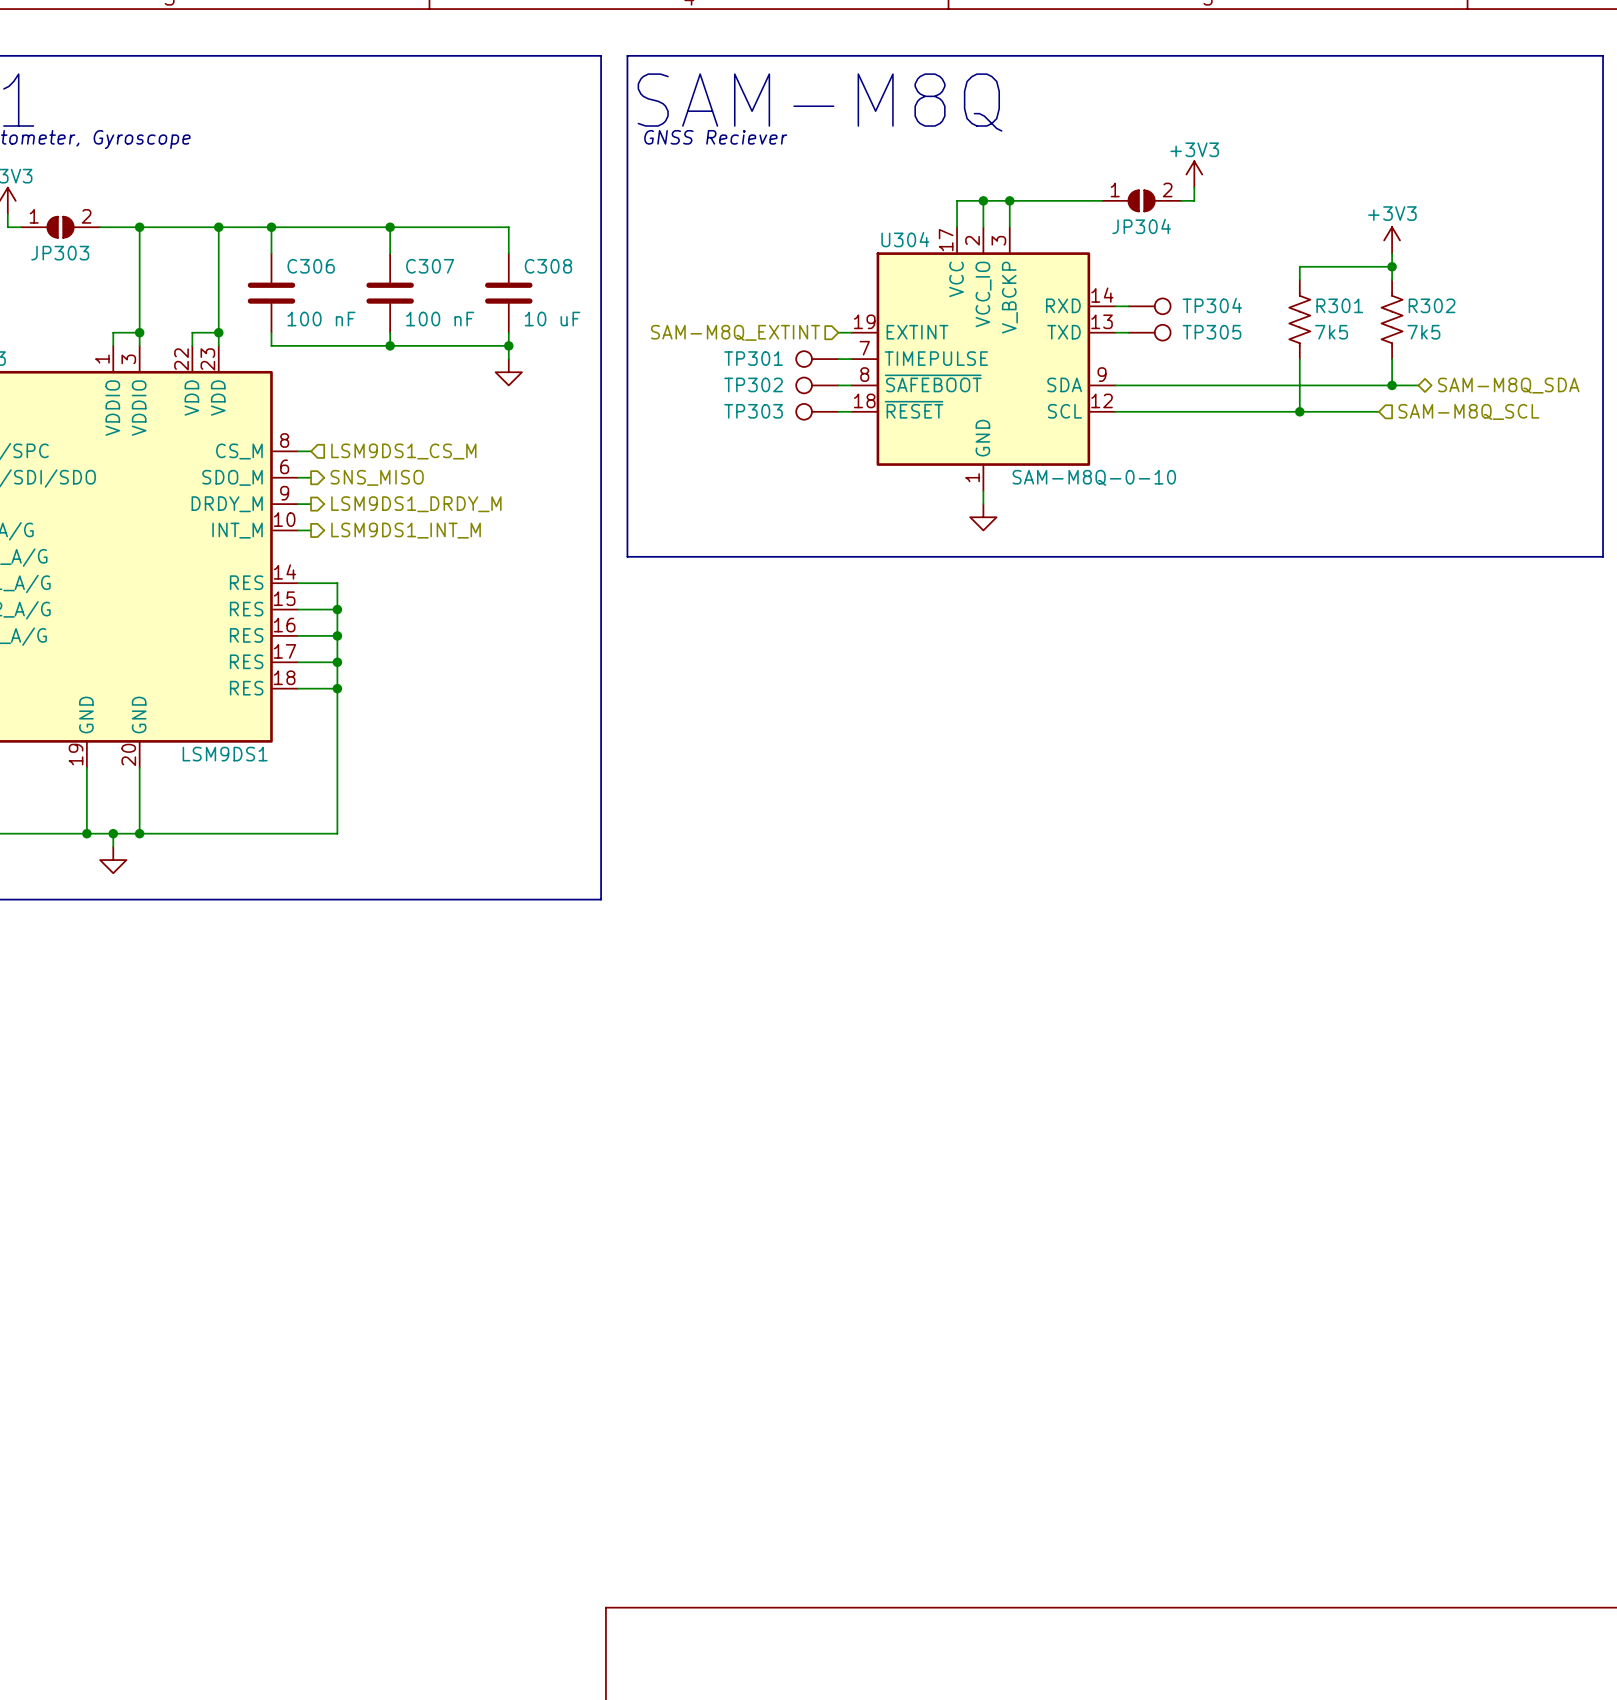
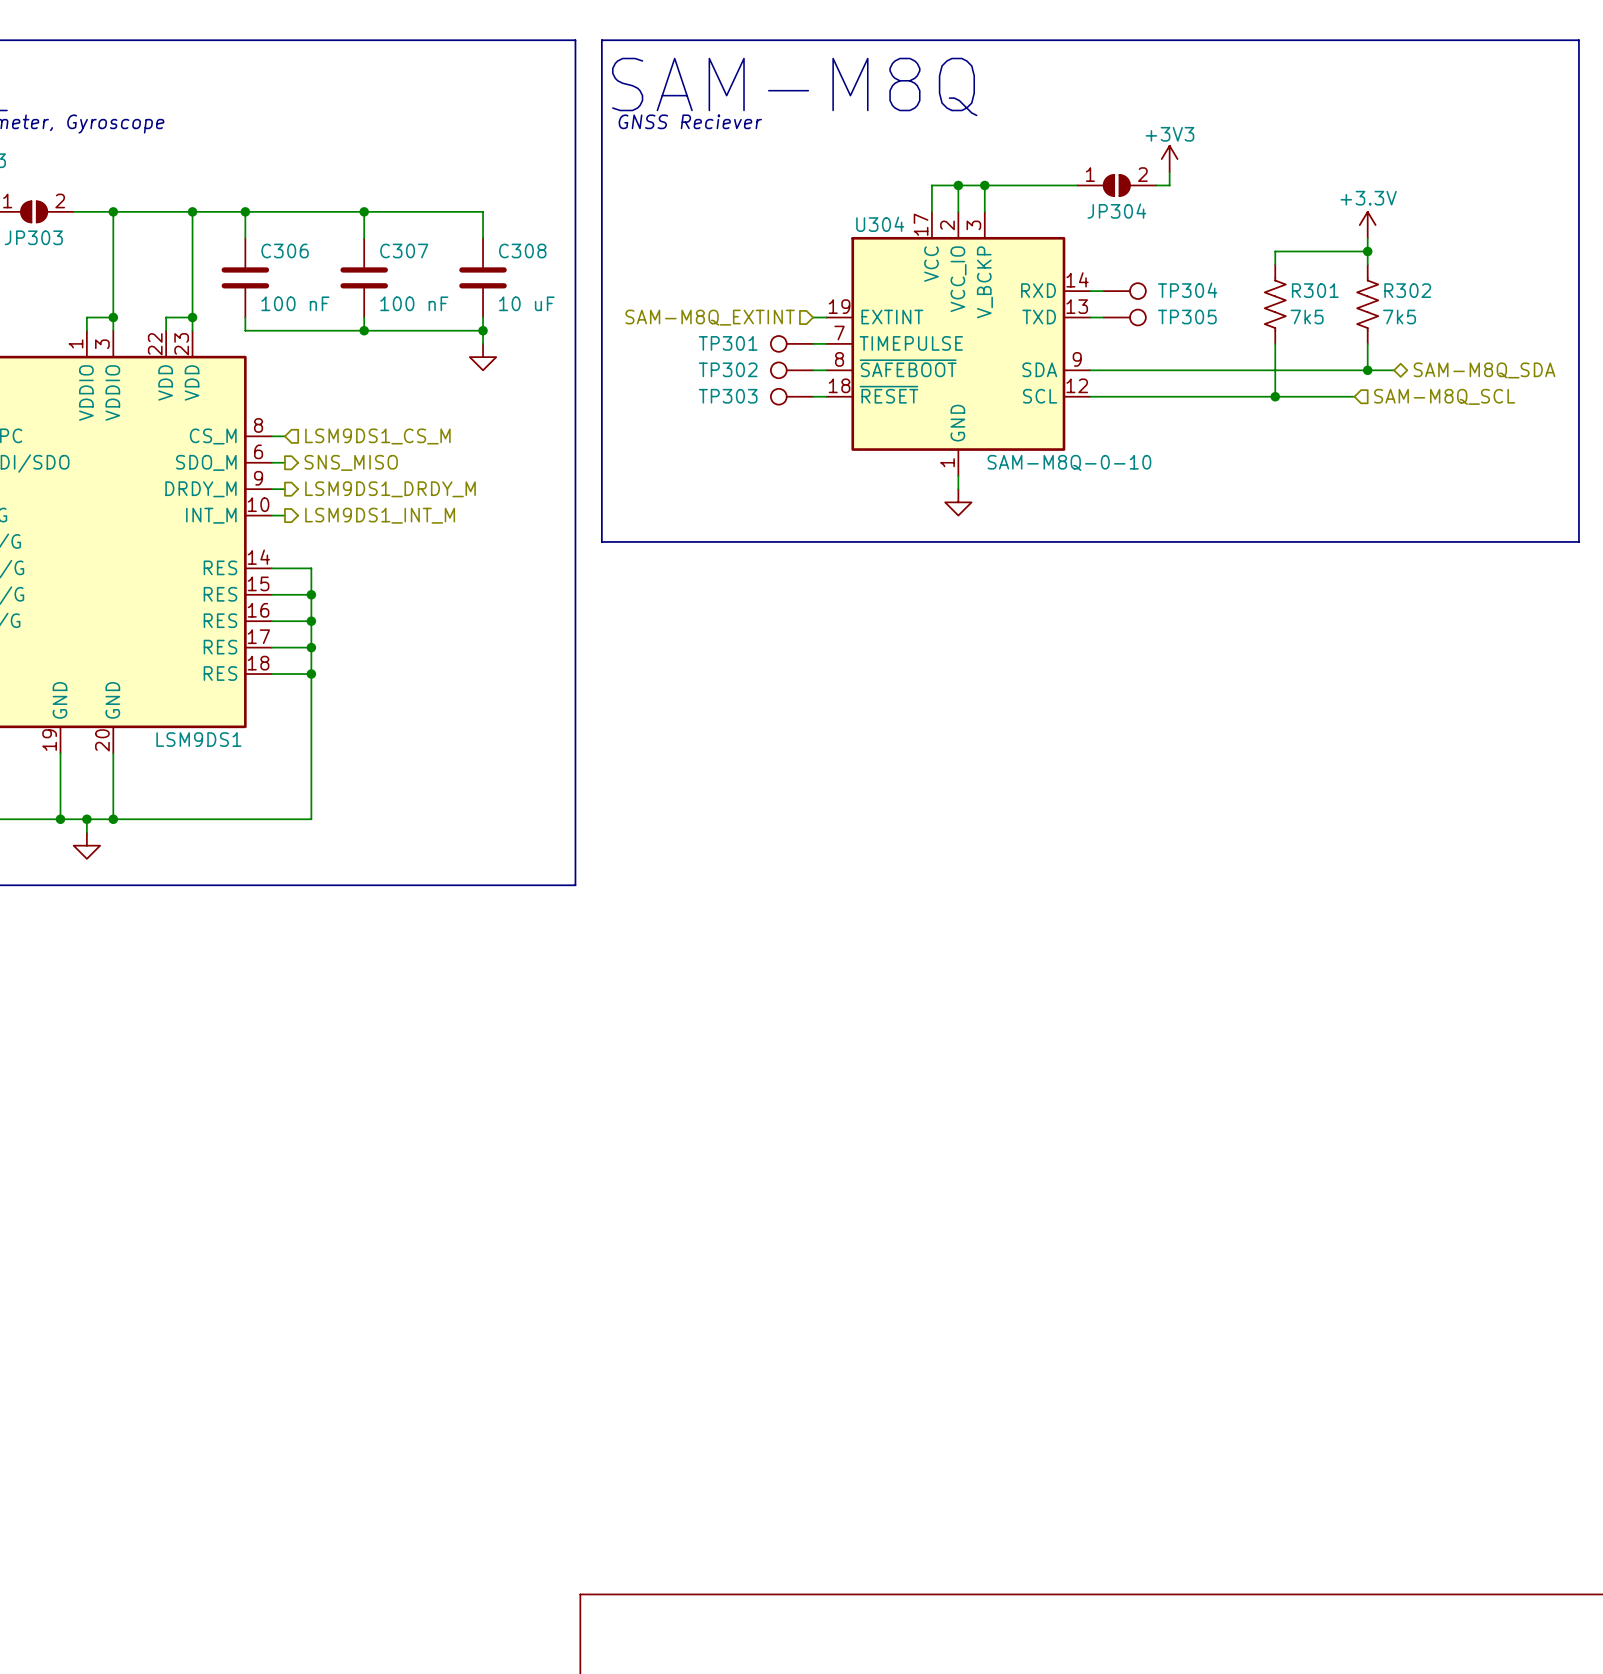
power symbol: +3V3 (1392, 240) -> +3.3V (1367, 225)

